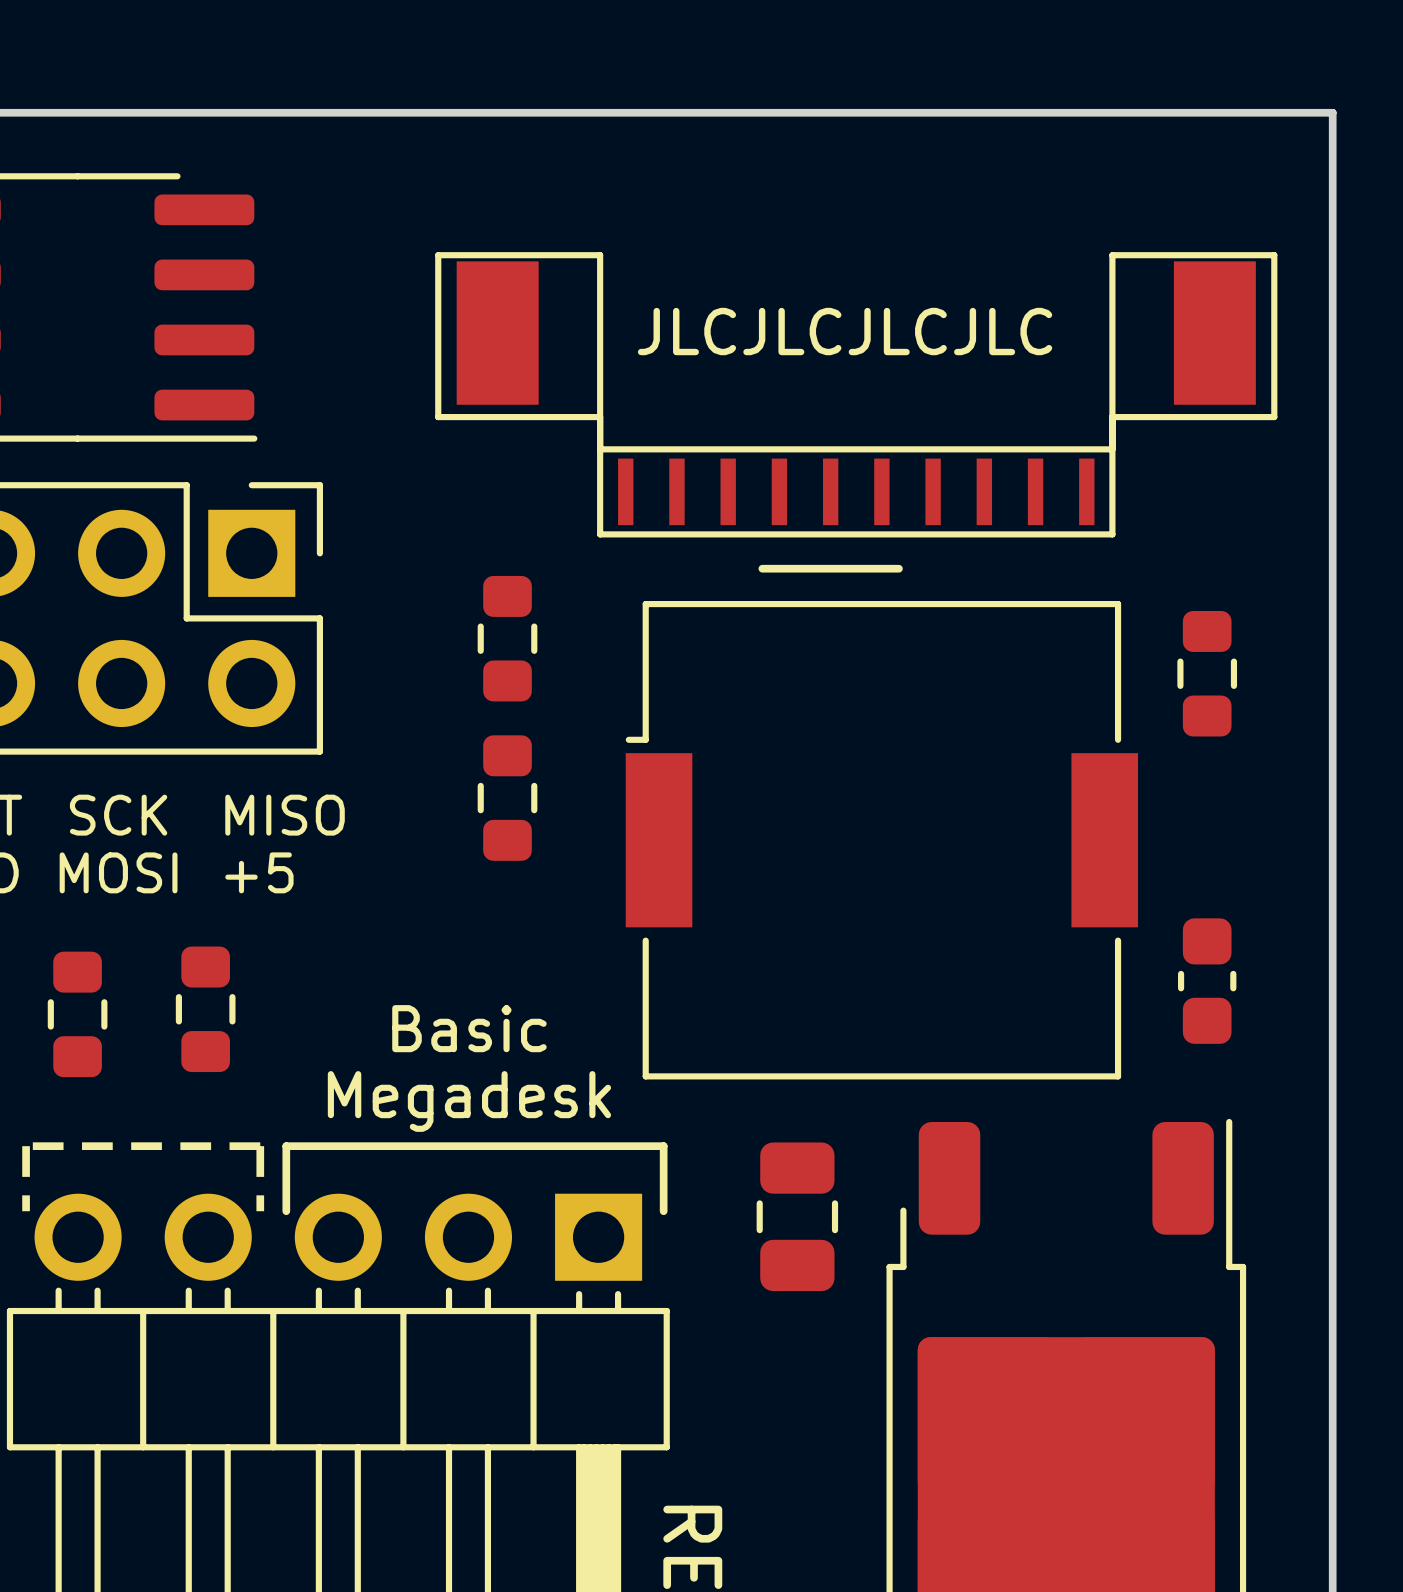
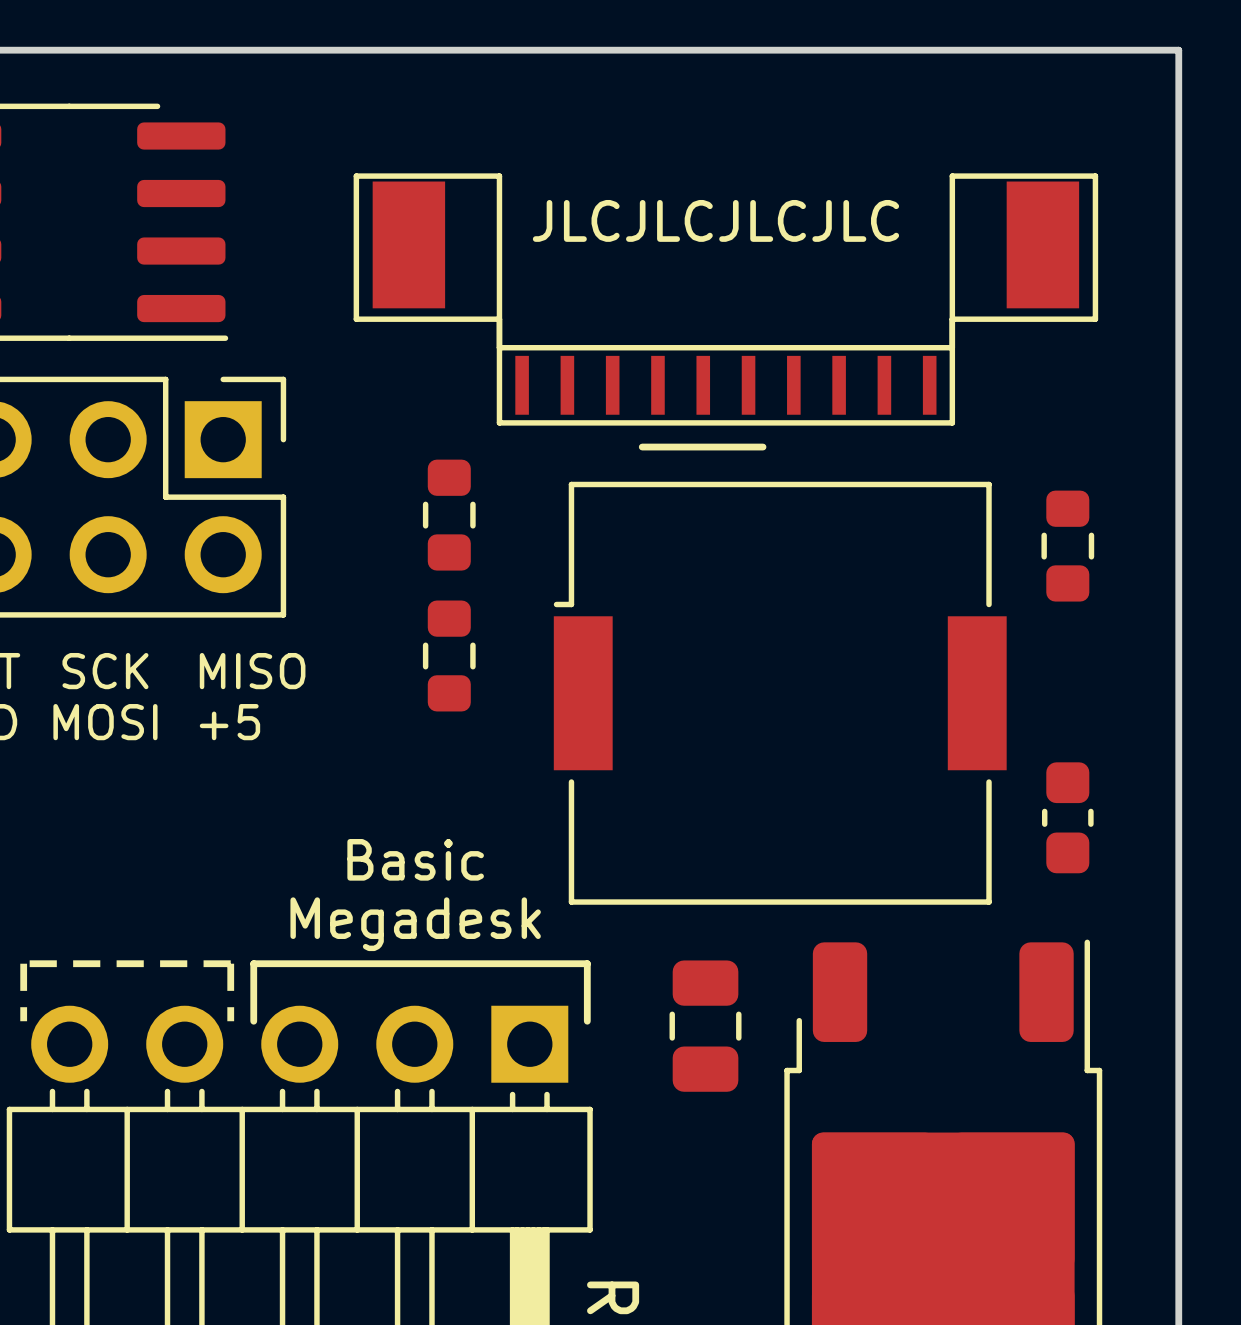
text position: JLCJLCJLCJLC (845, 331) -> JLCJLCJLCJLC (715, 220)
part position: (856, 394) -> (725, 299)
line: (762, 568) (898, 568) -> (642, 447) (763, 447)
part: (205, 1009) -> none
part: (77, 1014) -> none

